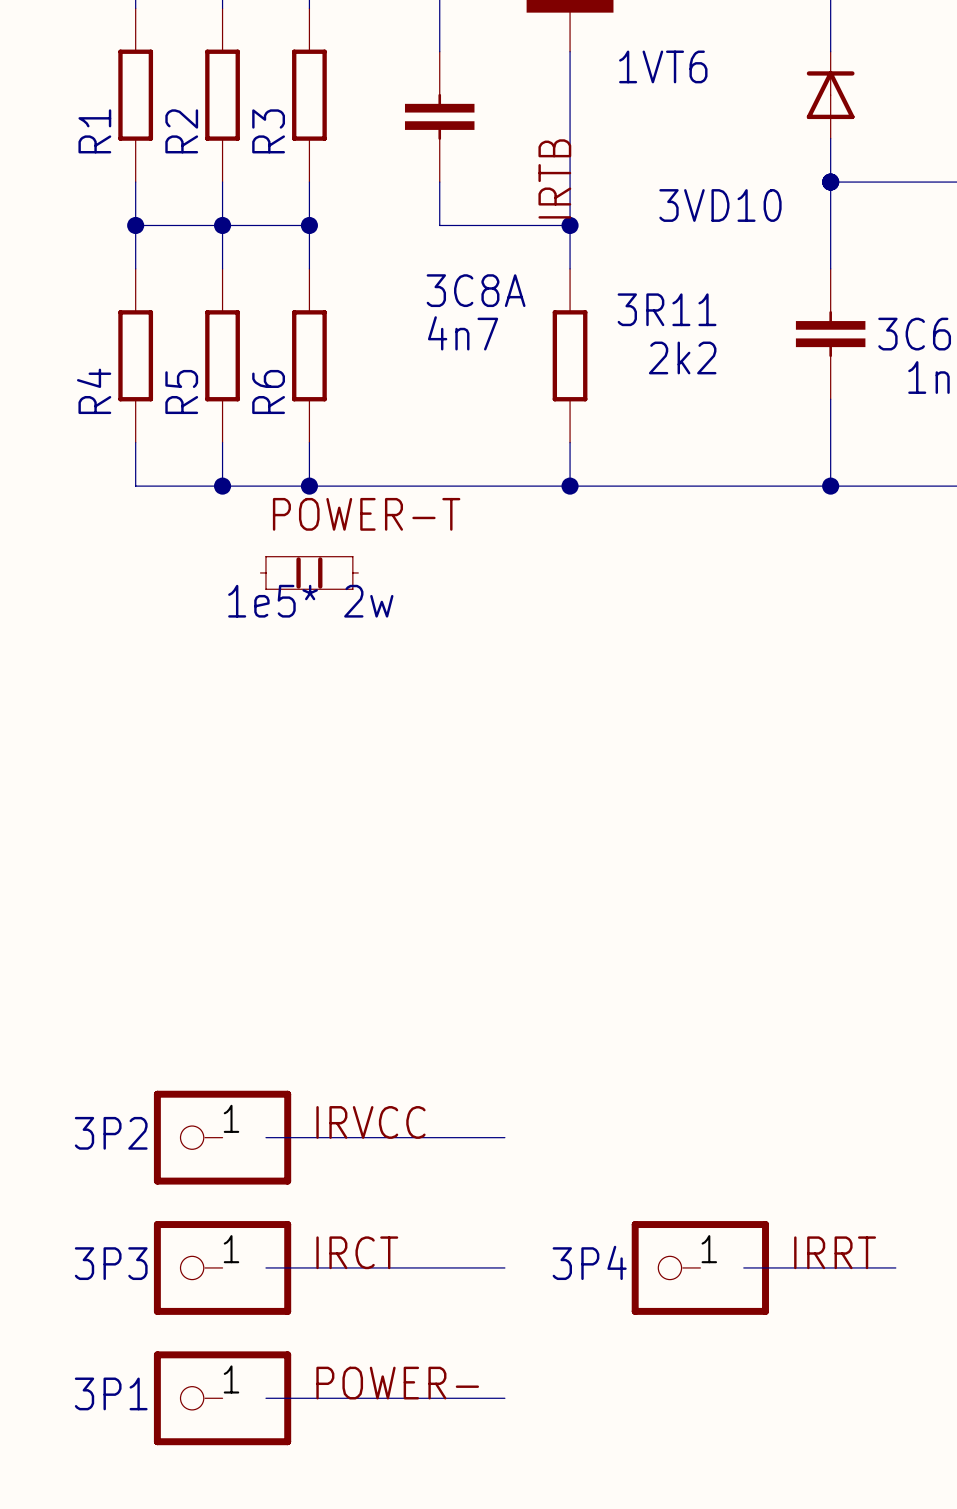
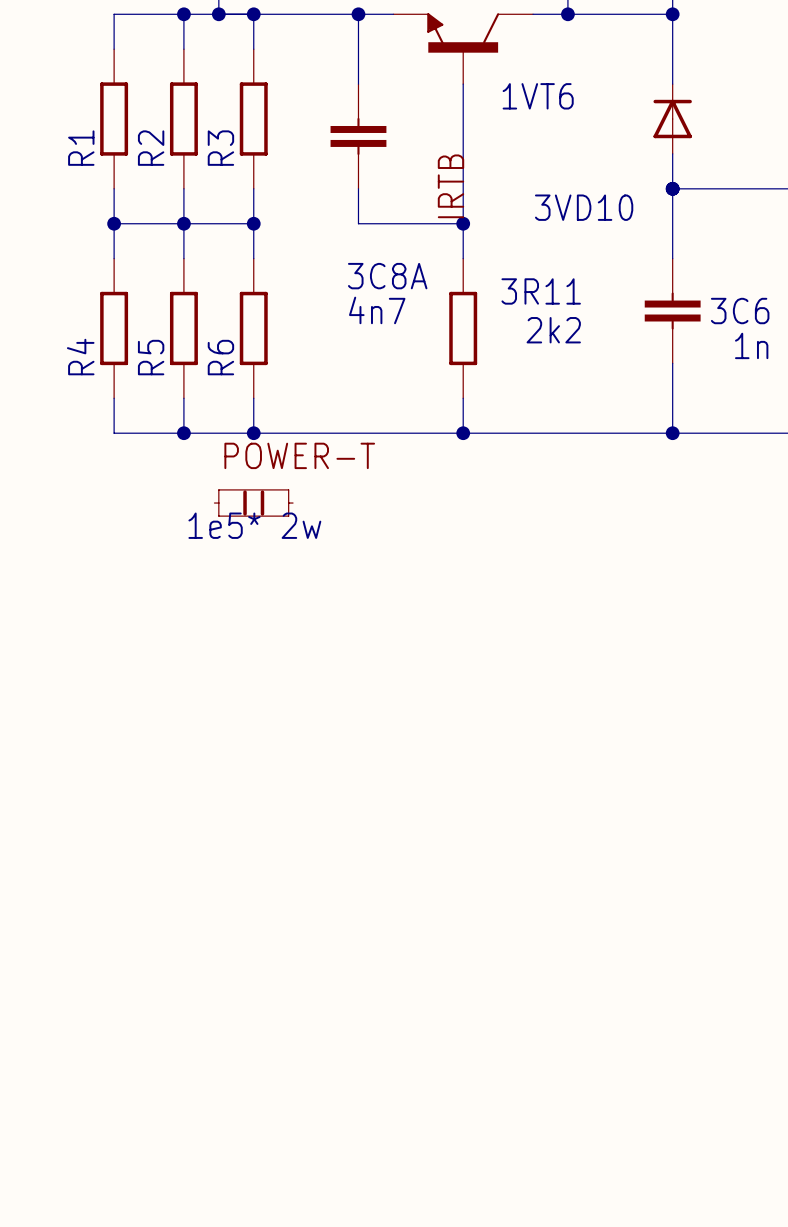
label: IRVCC (370, 1122) -> none
3P2: (222, 1137) -> none
wire: (265, 1137) (504, 1137) -> none
label: IRCT (357, 1252) -> none
label: IRRT (835, 1252) -> none
3P3: (222, 1267) -> none
wire: (265, 1267) (504, 1267) -> none
3P4: (700, 1267) -> none
wire: (743, 1267) (895, 1267) -> none
label: POWER- (397, 1383) -> none
3P1: (222, 1398) -> none
wire: (265, 1398) (504, 1398) -> none

